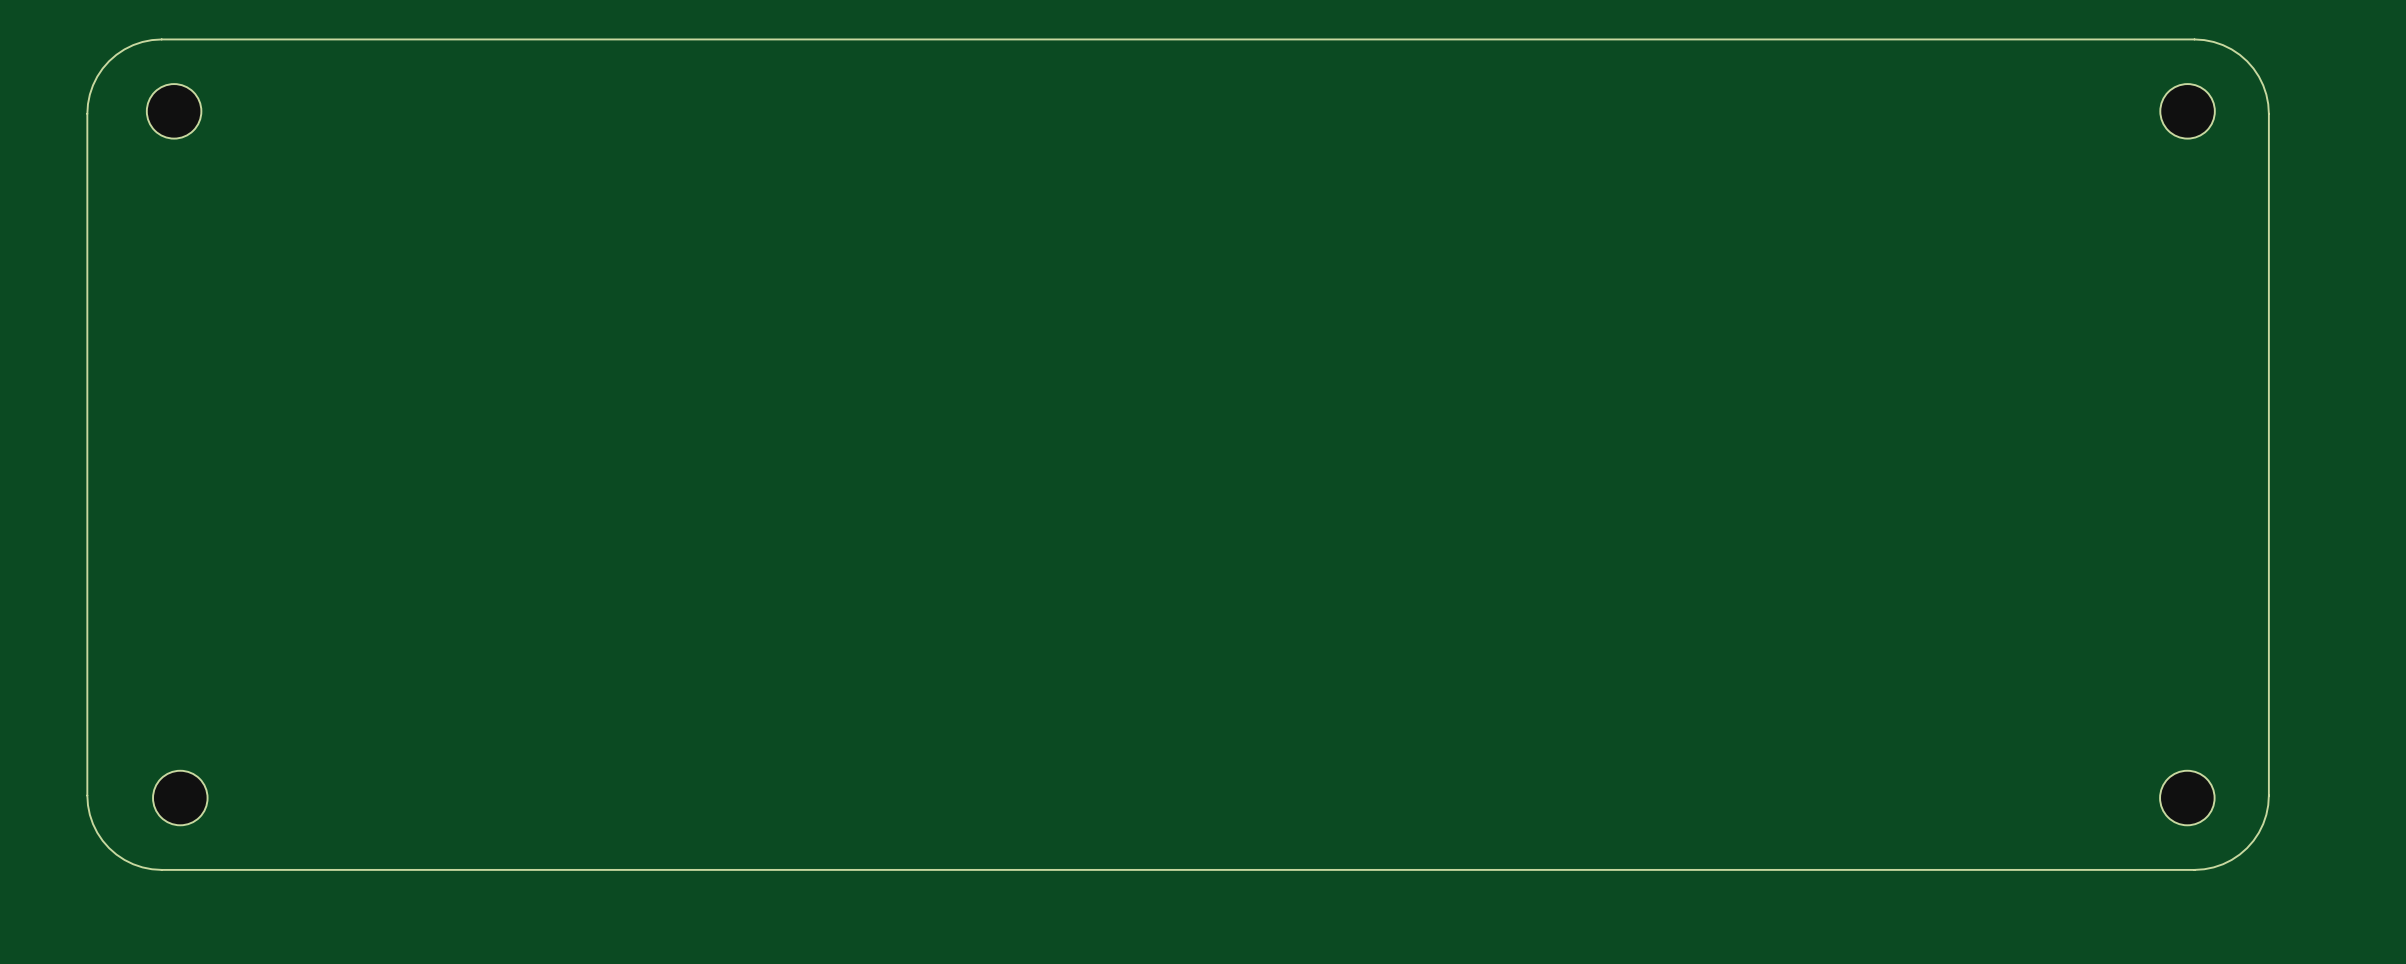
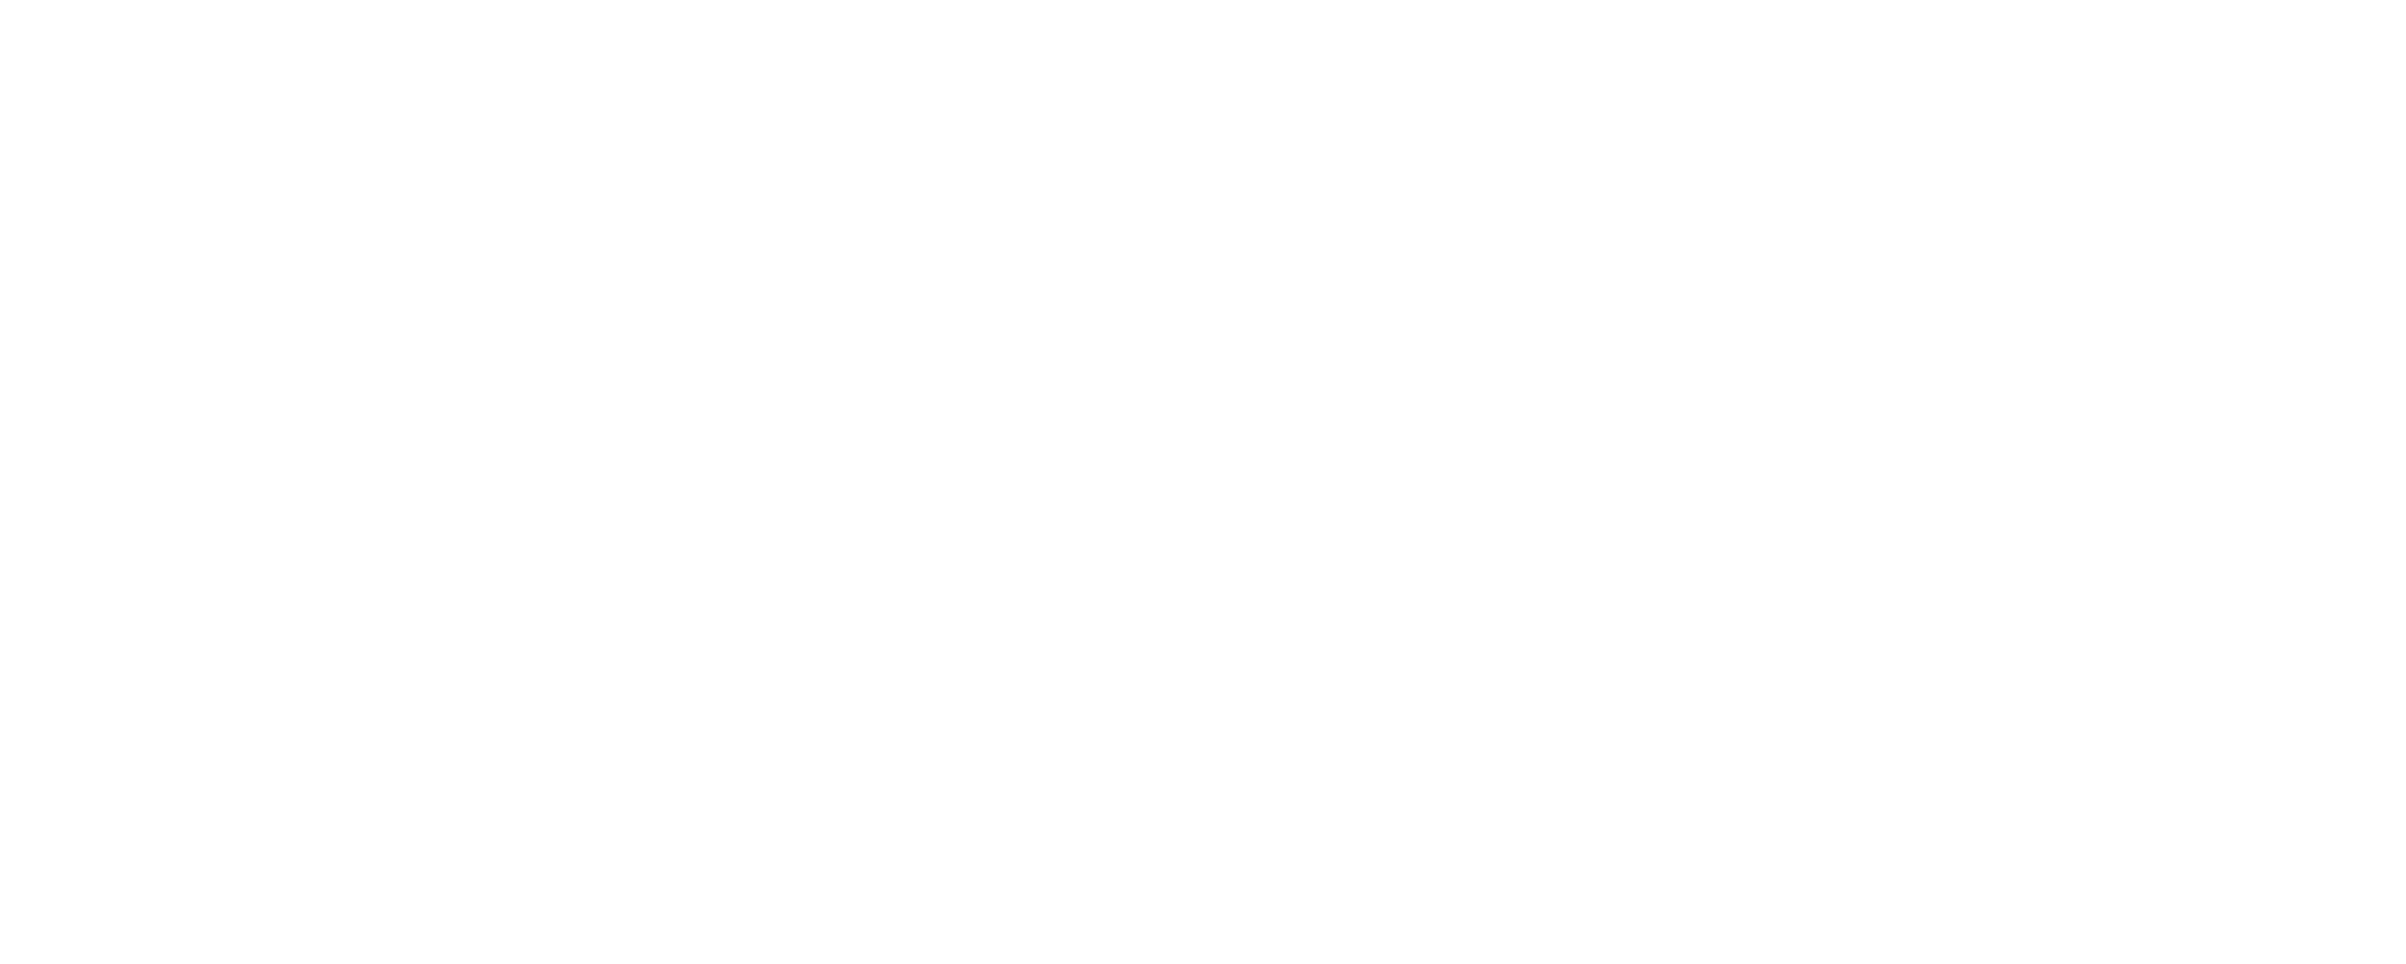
board edge: (2194, 39) (161, 39) (133, 45) (116, 54) (102, 68) (92, 85) (87, 113) (87, 795) (92, 824) (102, 840) (116, 854) (133, 864) (161, 869) (2194, 869) (2222, 864) (2239, 854) (2258, 832) (2266, 814) (2268, 795) (2268, 113) (2263, 85) (2247, 61) (2222, 45) (2194, 39) -> none
part: (174, 111) -> none
part: (2187, 111) -> none
part: (180, 798) -> none
part: (2187, 798) -> none

